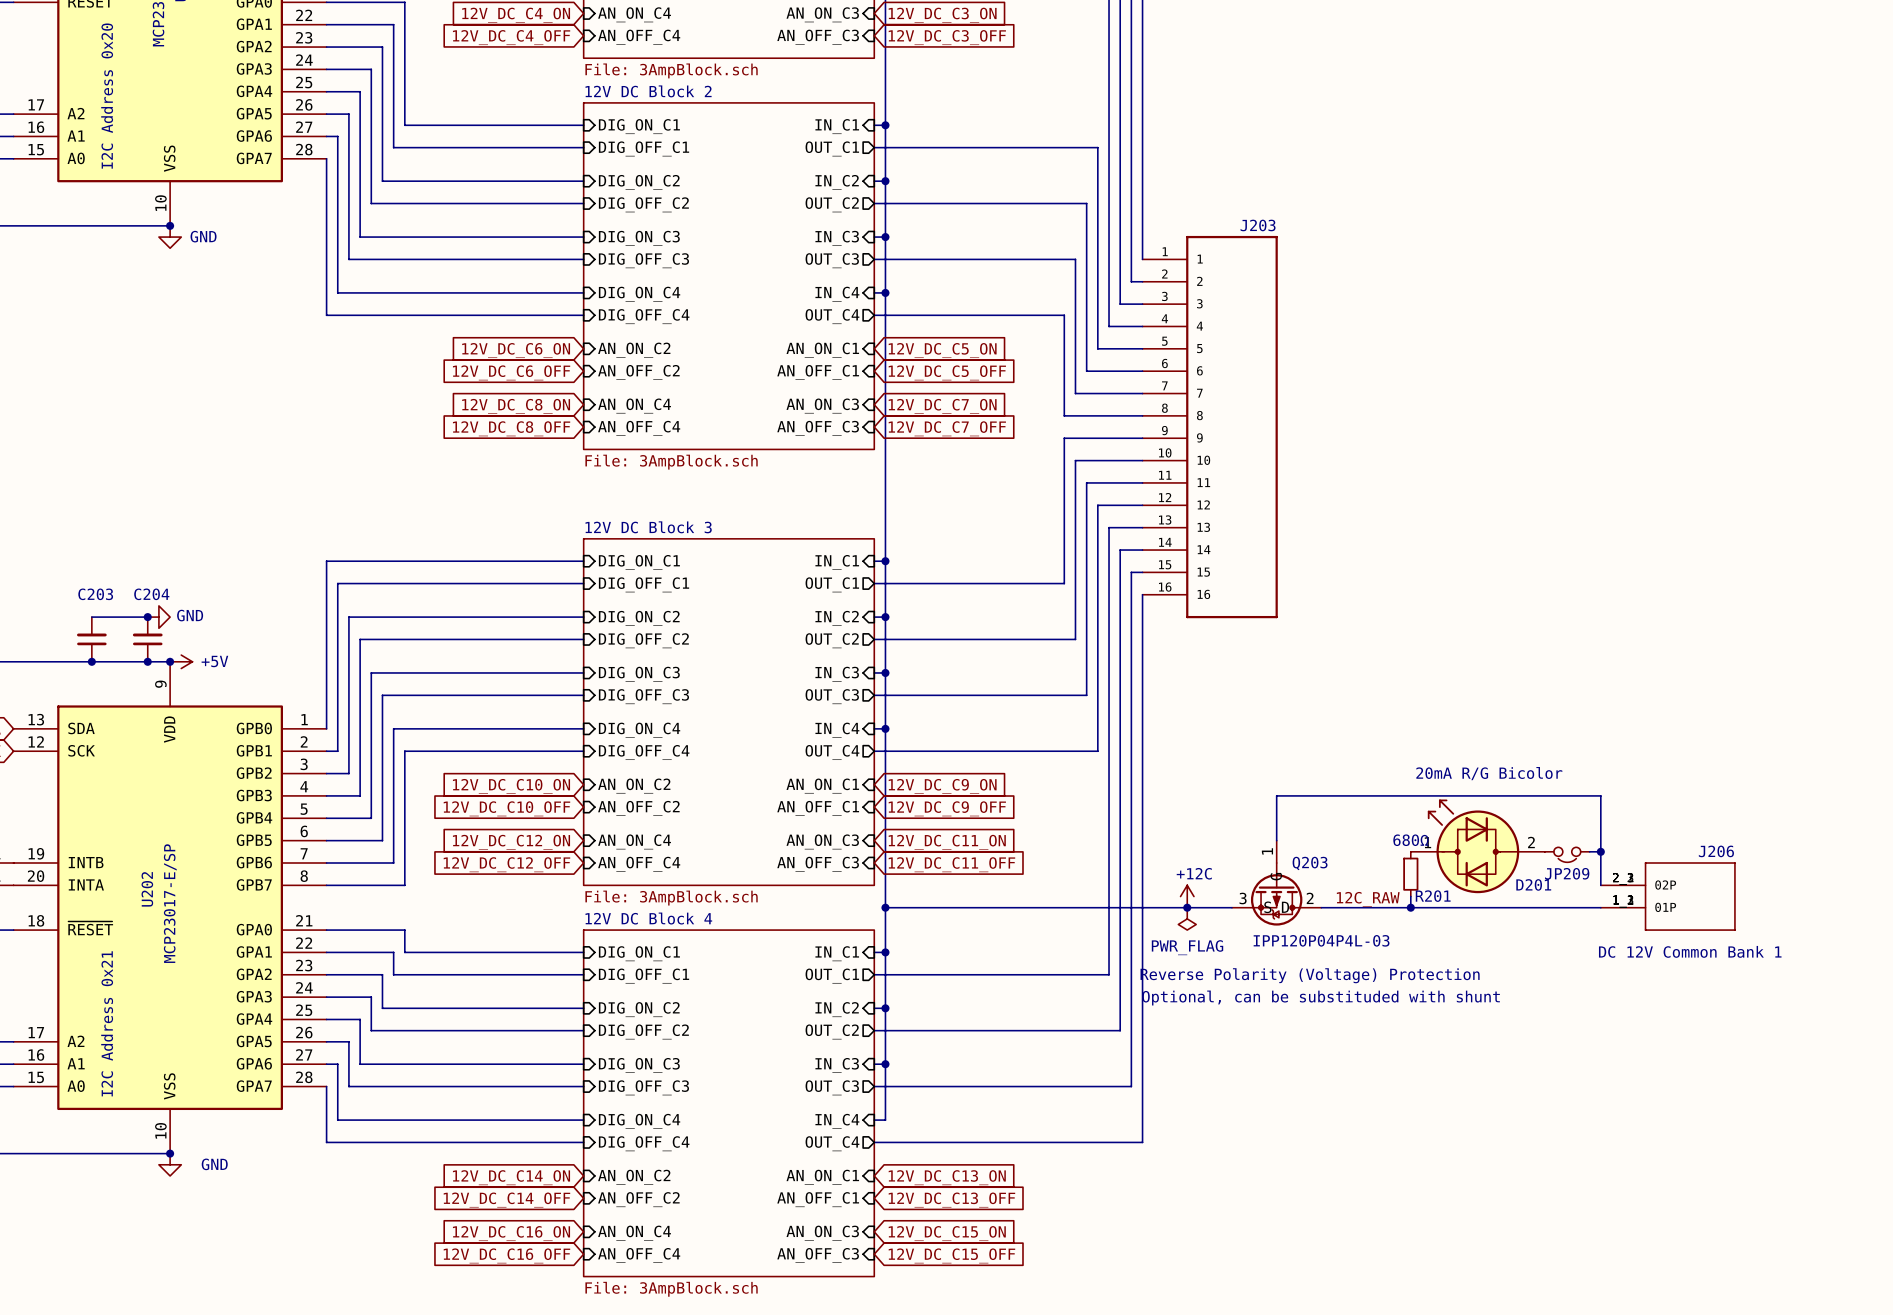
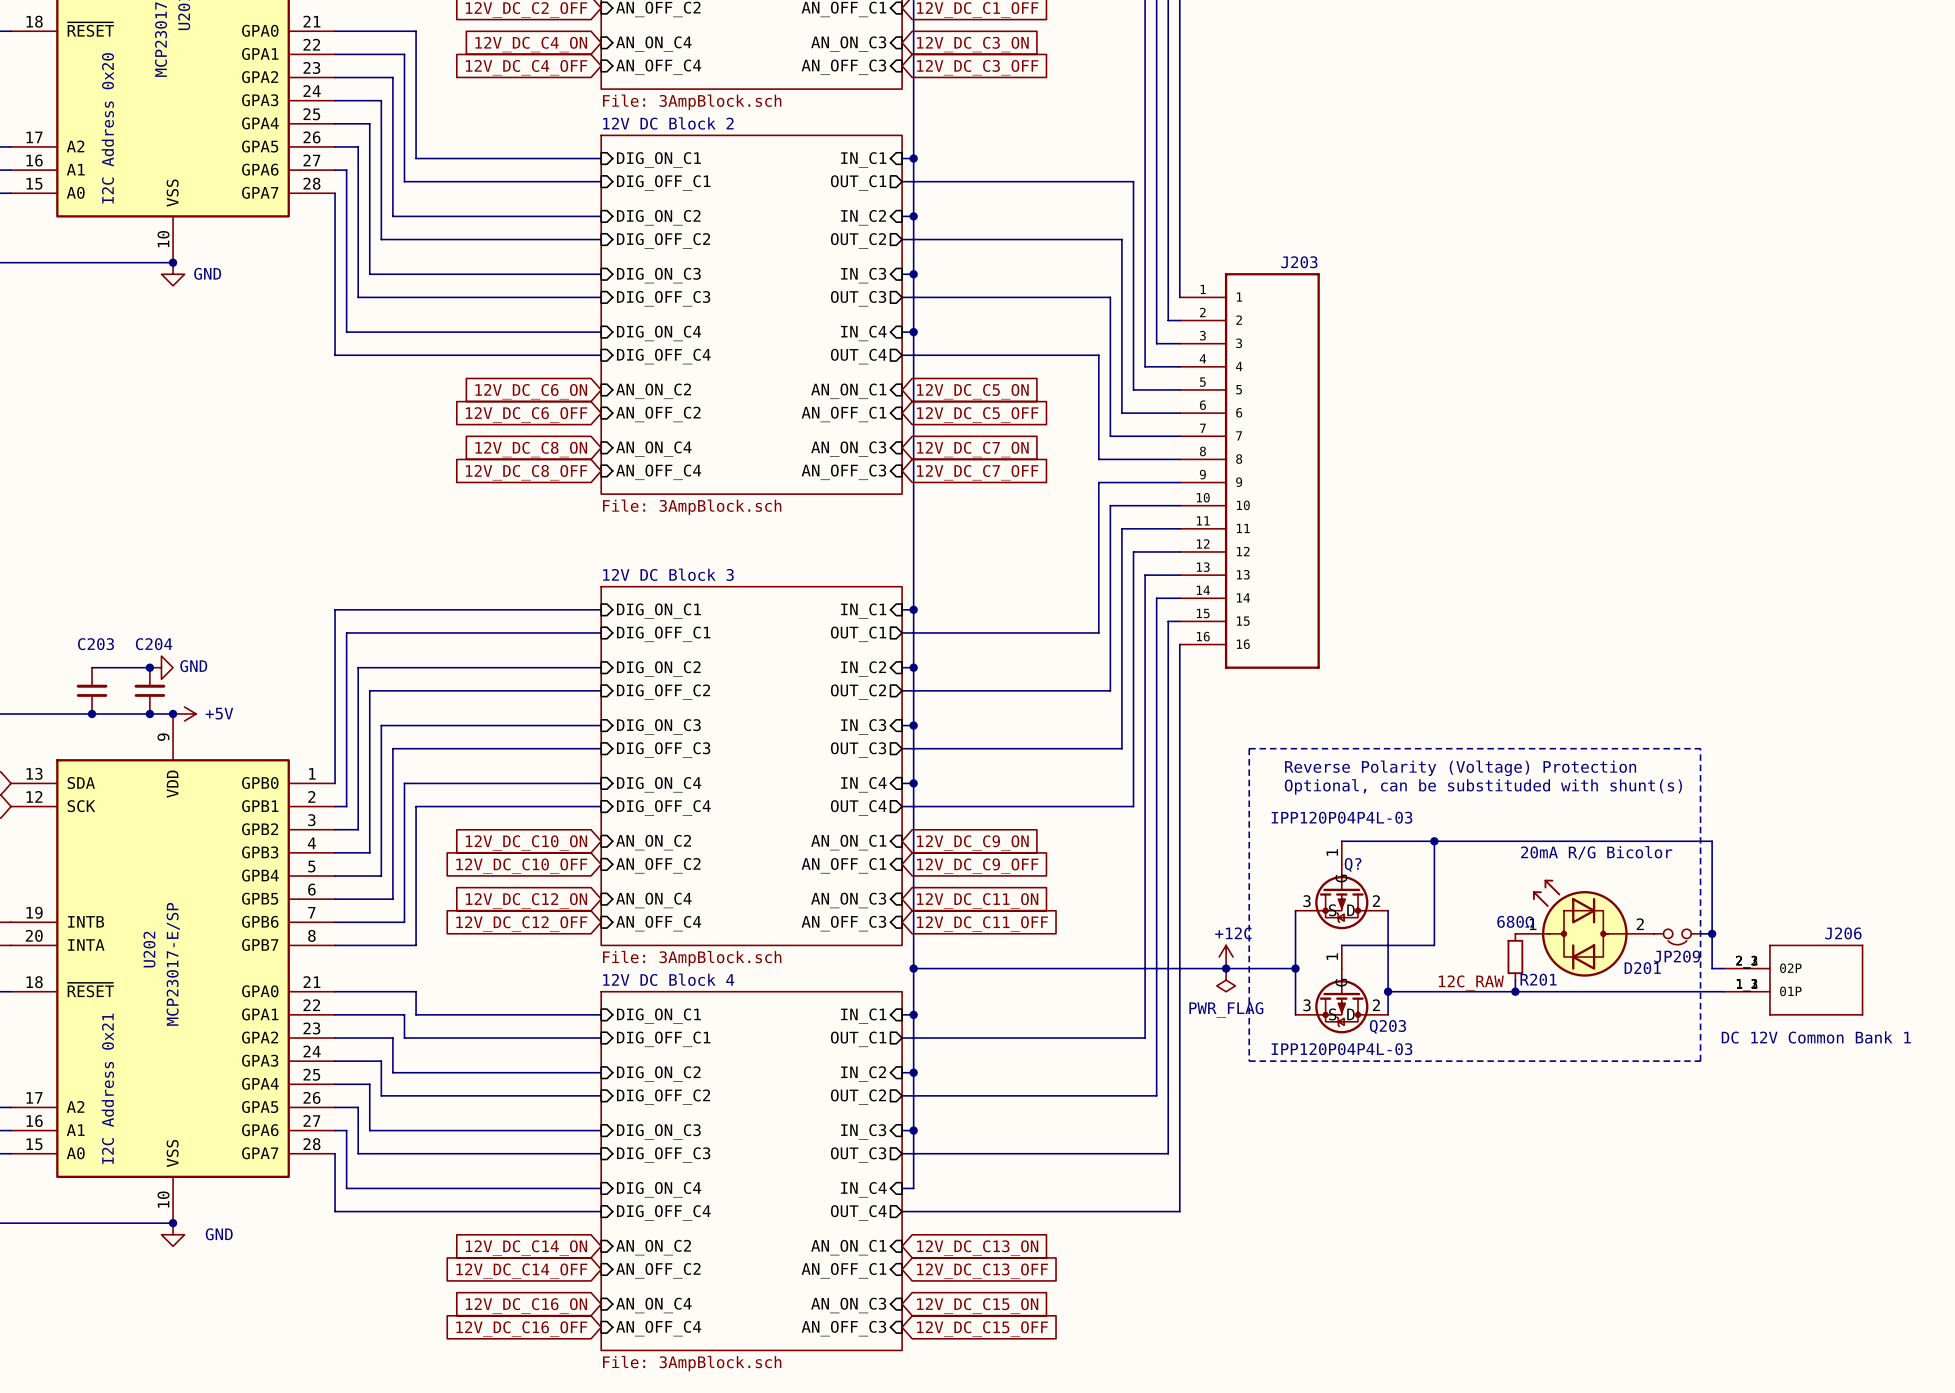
line: none -> (1249, 748) (1249, 1061) (1700, 1061) (1700, 748) (1249, 748)
text: none -> Reverse Polarity (Voltage) Protection (1460, 768)
text: none -> Optional, can be substituded with shunt(s) (1483, 786)
wire: none -> (1341, 841) (1712, 841) (1712, 968) (1723, 968)
wire: none -> (1434, 841) (1434, 945) (1341, 945)
junction: none -> (1434, 841)
Q?: none -> IPP120P04P4L-03 (1341, 885)
wire: (1276, 840) (1276, 795) (1600, 795) (1600, 885) -> none
D201 position: (1477, 846) -> (1584, 928)
wire: none -> (1295, 910) (1295, 1014)
wire: none -> (1388, 910) (1388, 1014)
wire: (1589, 851) (1600, 851) -> (1700, 933) (1712, 933)
junction: (1600, 851) -> none
JP209 position: (1567, 854) -> (1677, 936)
Q203 name position: Q203 (1310, 863) -> Q203 (1387, 1026)
R201 position: (1410, 874) -> (1515, 957)
junction: none -> (1712, 933)
Q203 position: (1276, 883) -> (1341, 989)
wire: (1410, 896) (1410, 907) -> (1515, 980) (1515, 991)
J206 position: (1668, 896) -> (1793, 980)
label position: 12C_RAW (1368, 899) -> 12C_RAW (1471, 983)
junction: none -> (1295, 968)
wire: (1321, 907) (1600, 907) -> none
junction: (1410, 907) -> none
wire: none -> (1388, 991) (1723, 991)
junction: none -> (1388, 991)
junction: none -> (1515, 991)
Q203 value position: IPP120P04P4L-03 (1321, 940) -> IPP120P04P4L-03 (1341, 1049)
Q203 text: Reverse Polarity (Voltage) Protection (1310, 975) -> none
Q203 text: Optional, can be substituded with shunt (1321, 998) -> none

